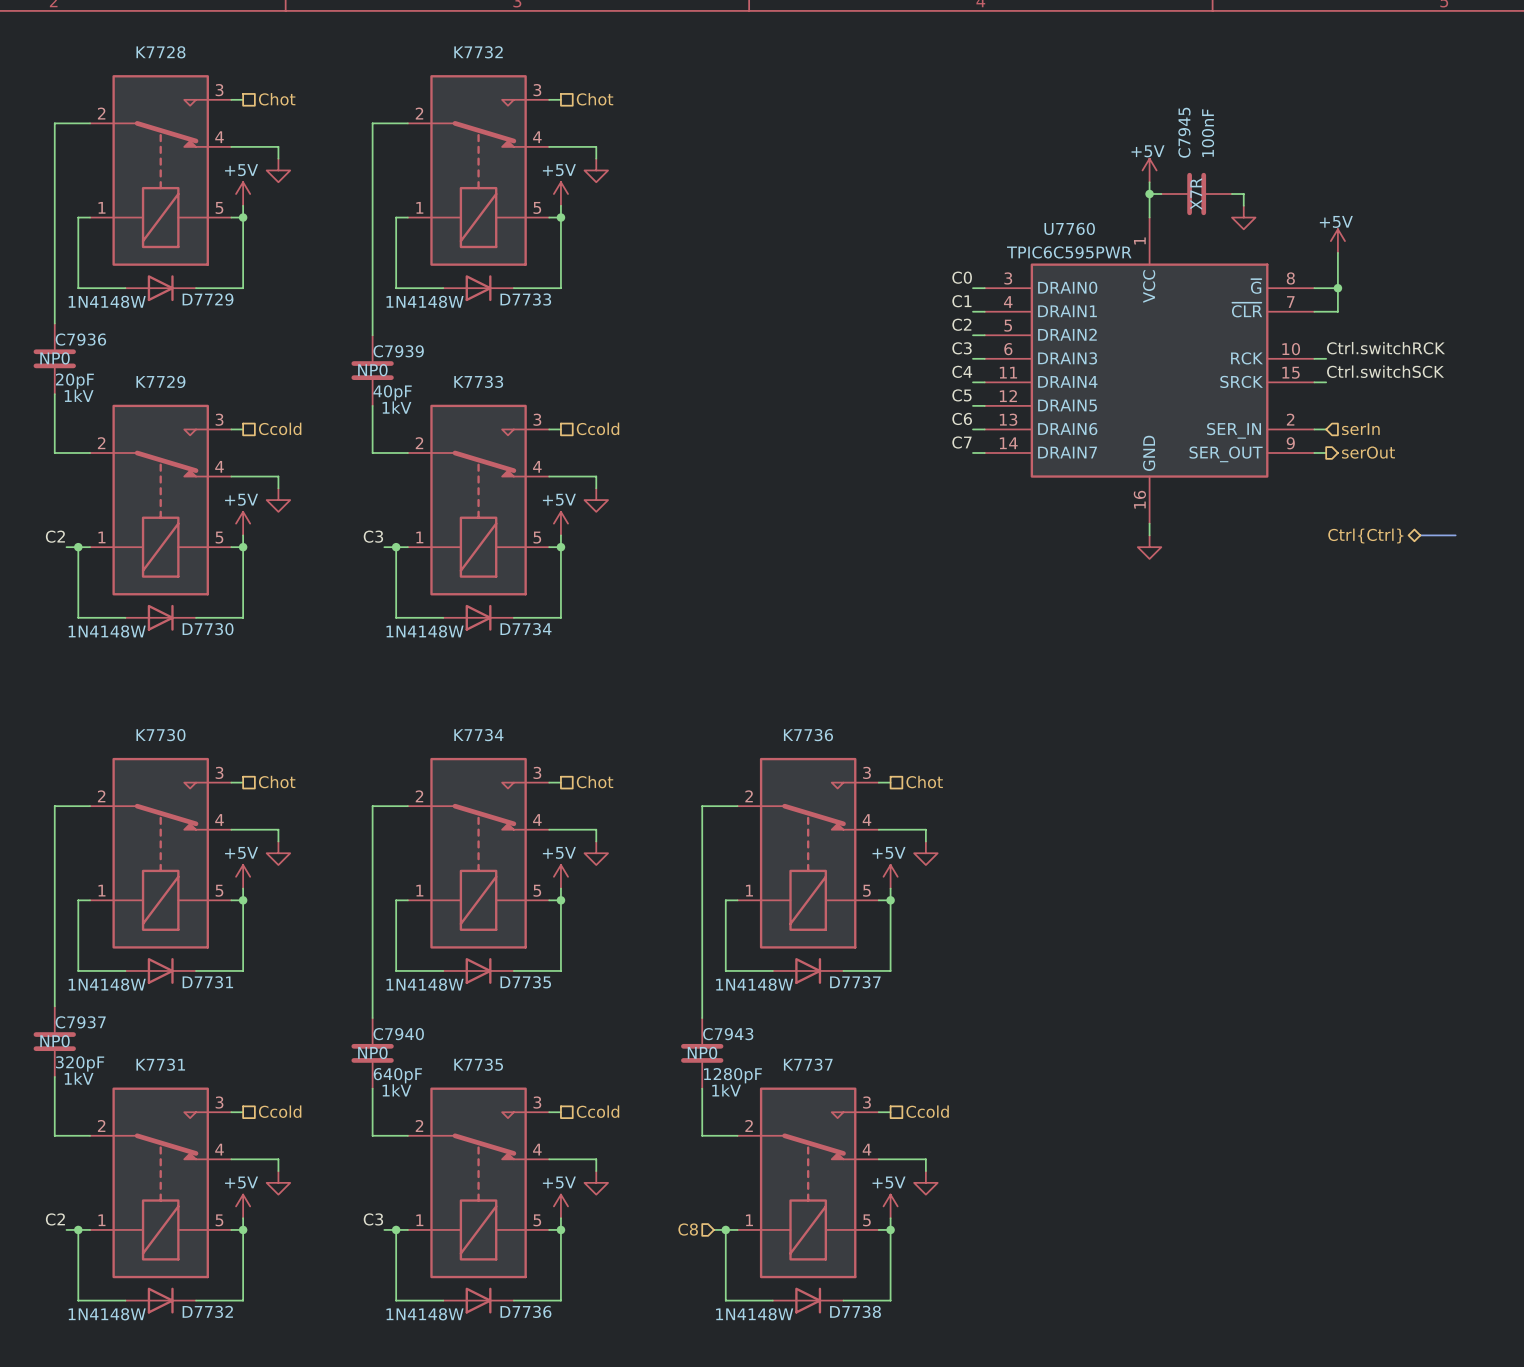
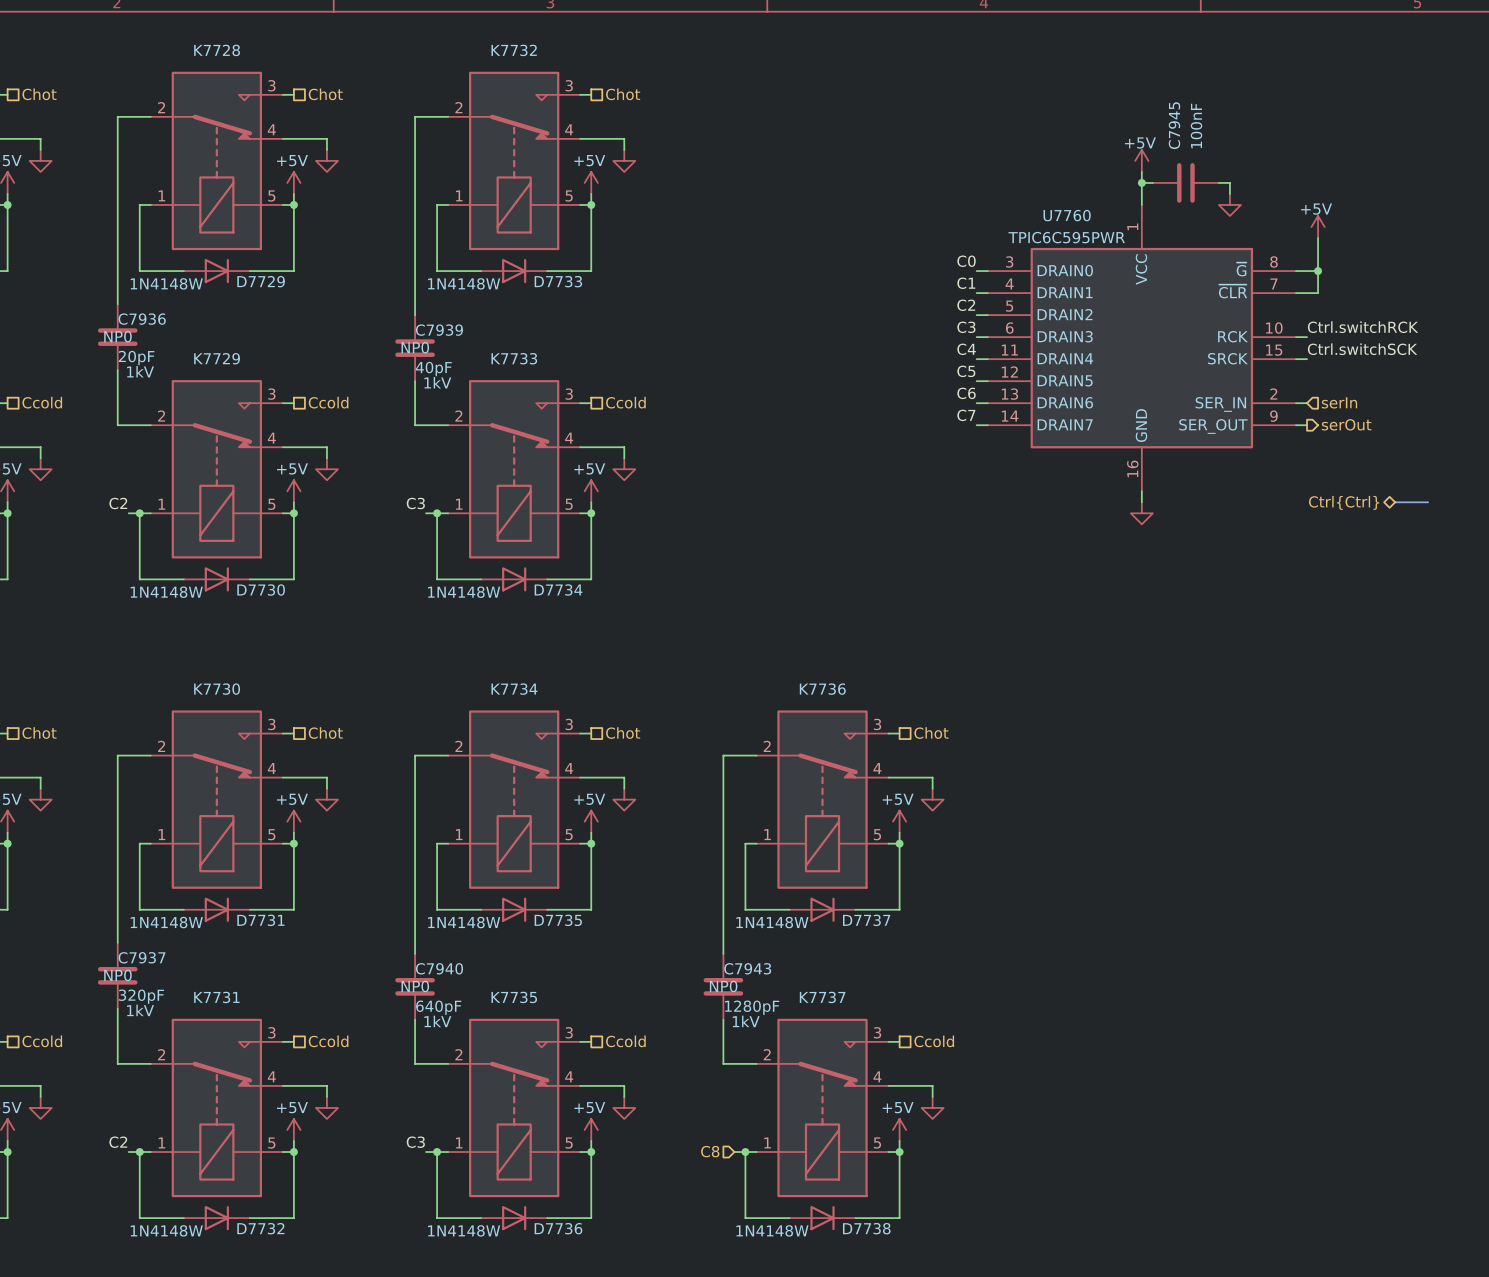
C7945 text: X7R (1196, 193) -> none

